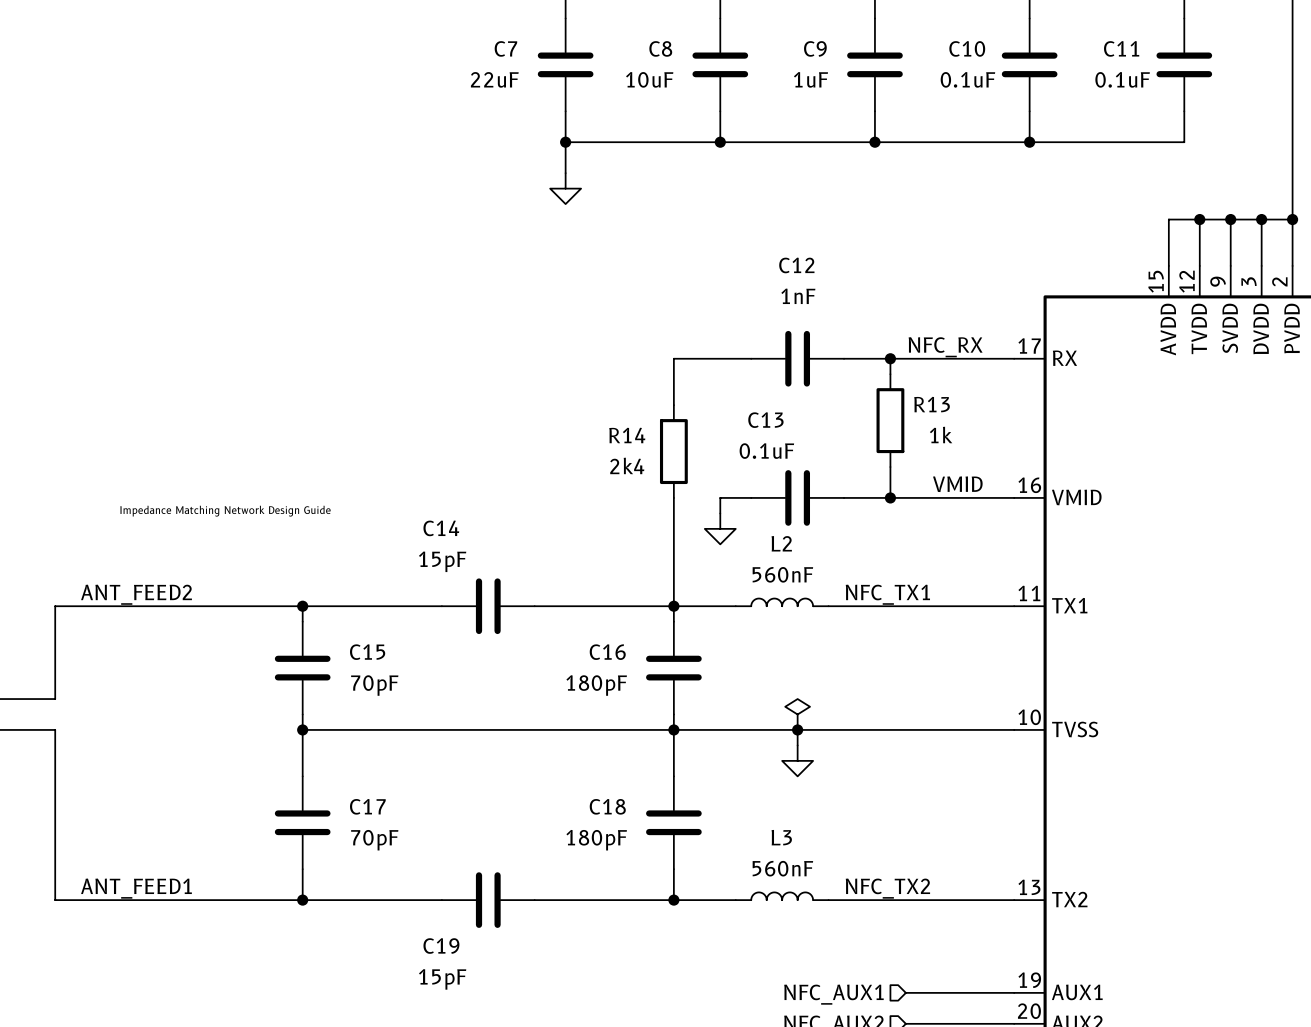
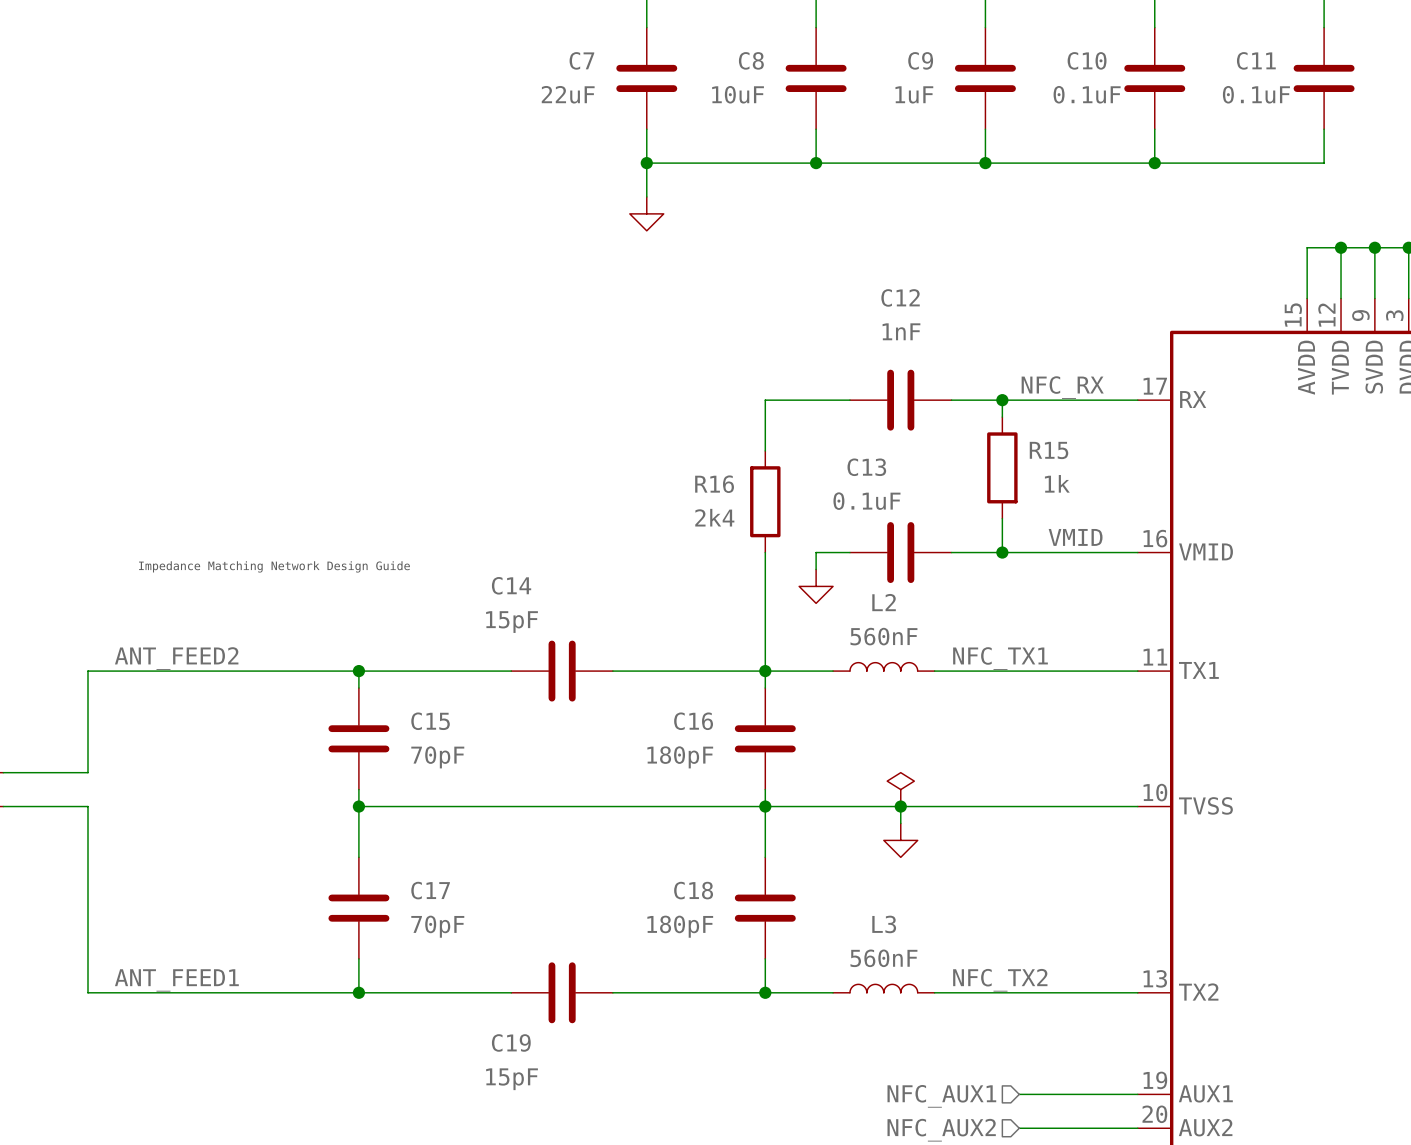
R13 name: R13 (932, 404) -> R15 (1049, 450)
R14 name: R14 (627, 435) -> R16 (714, 484)

